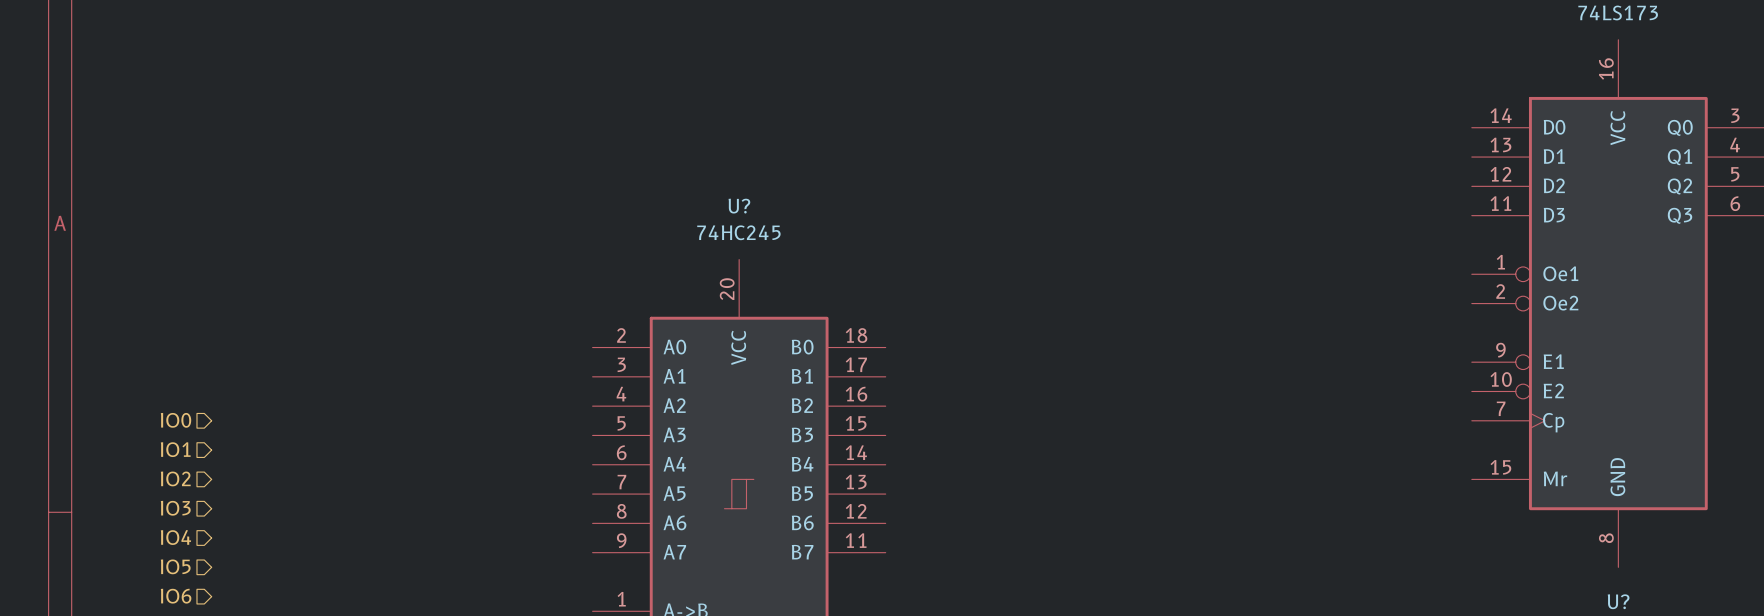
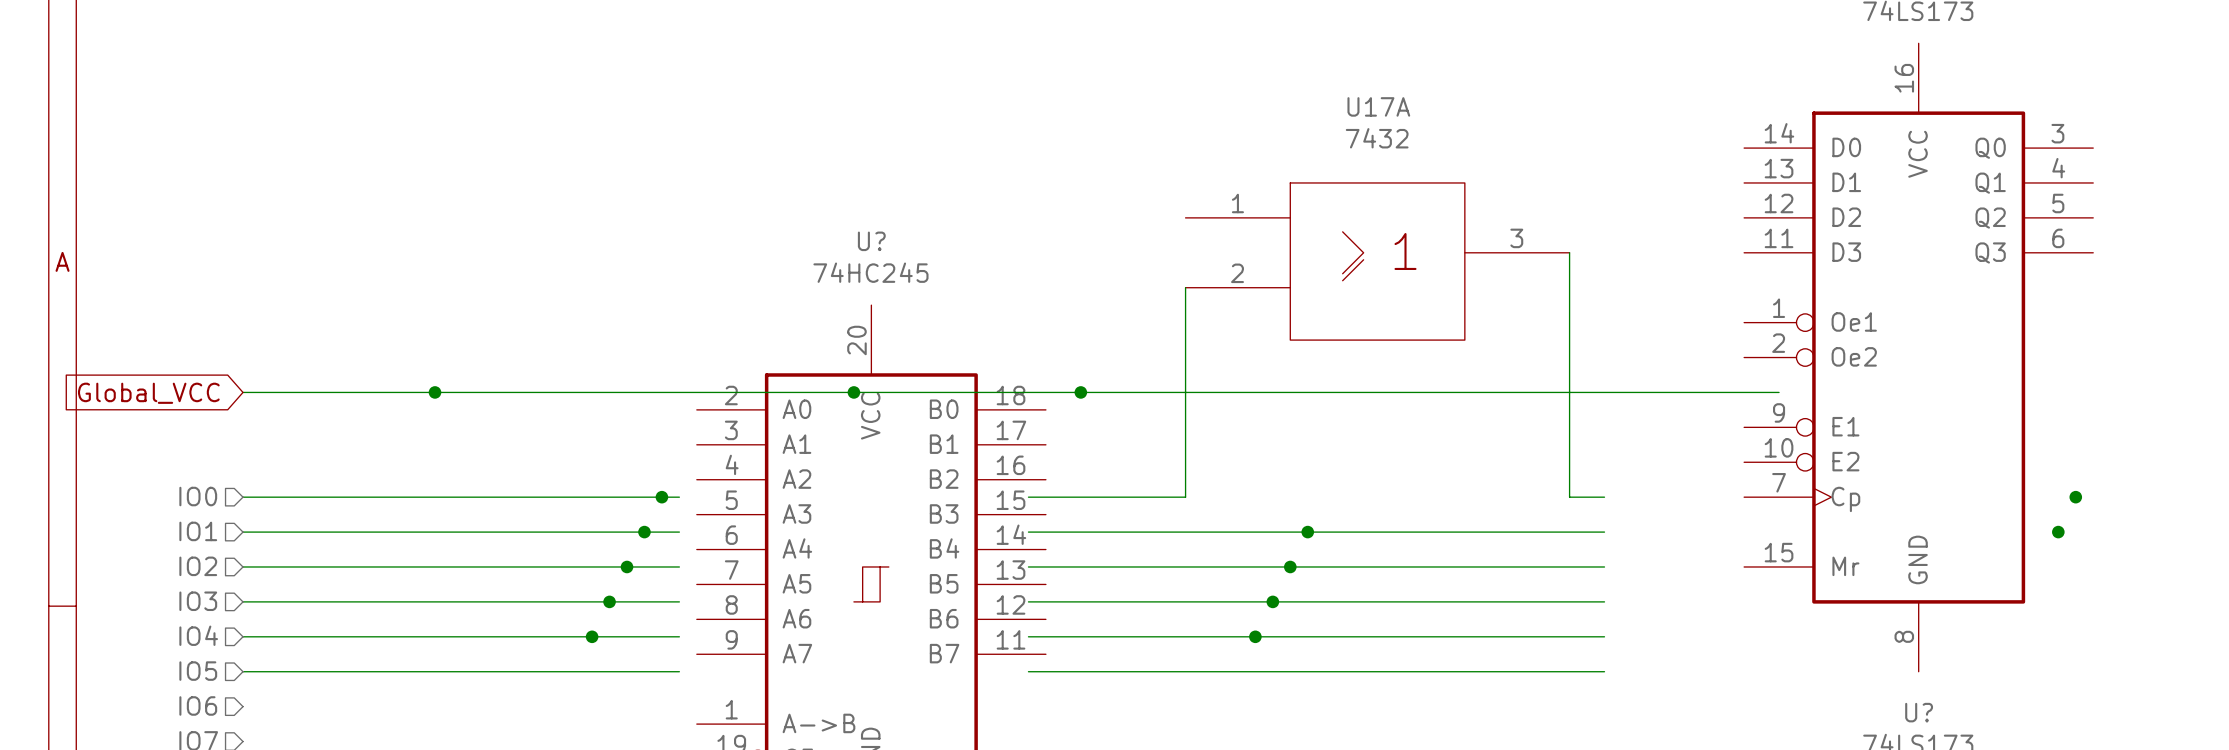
wire: none -> (1569, 252) (1569, 497) (1604, 497)
U17A: none -> 7432 (1377, 261)
wire: none -> (1185, 287) (1185, 497) (1028, 497)
wire: none -> (242, 392) (1779, 392)
junction: none -> (435, 392)
junction: none -> (853, 392)
junction: none -> (1080, 392)
global label: none -> Global_VCC (148, 393)
wire: none -> (242, 497) (679, 497)
junction: none -> (661, 497)
junction: none -> (2075, 497)
wire: none -> (242, 532) (679, 532)
junction: none -> (644, 532)
wire: none -> (1028, 532) (1604, 532)
junction: none -> (1307, 532)
junction: none -> (2058, 532)
wire: none -> (242, 566) (679, 566)
junction: none -> (627, 566)
wire: none -> (1028, 566) (1604, 566)
junction: none -> (1290, 566)
wire: none -> (242, 601) (679, 601)
junction: none -> (609, 601)
wire: none -> (1028, 601) (1604, 601)
junction: none -> (1272, 601)
wire: none -> (242, 636) (679, 636)
junction: none -> (592, 636)
wire: none -> (1028, 636) (1604, 636)
junction: none -> (1255, 636)
wire: none -> (242, 671) (679, 671)
wire: none -> (1028, 671) (1604, 671)

